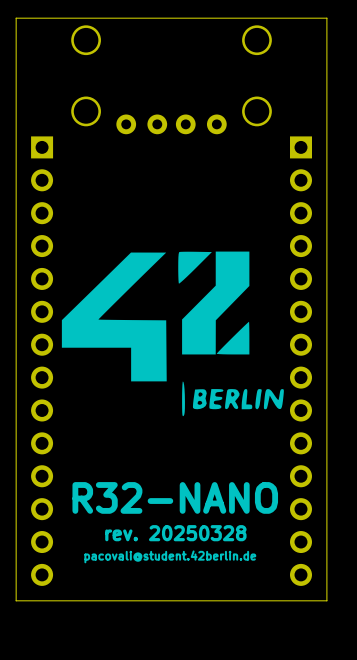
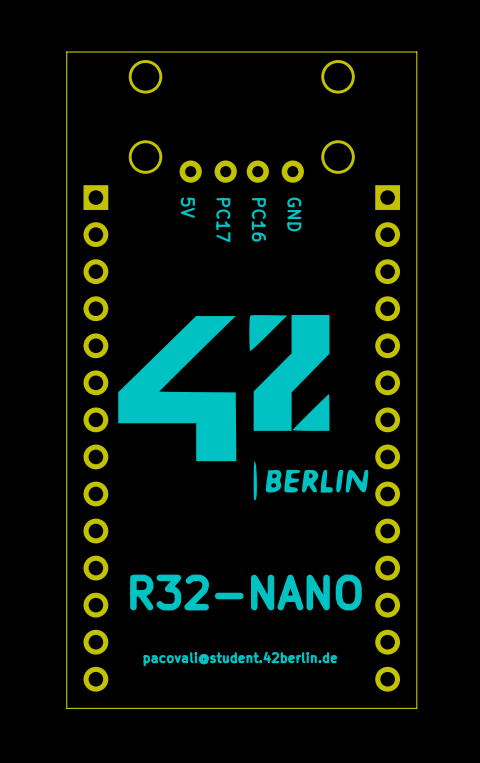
text: none -> 5V (187, 207)
text: none -> GND (294, 214)
text: none -> PC17 (223, 220)
text: none -> PC16 (258, 219)
text: rev. 20250328 (175, 533) -> none

